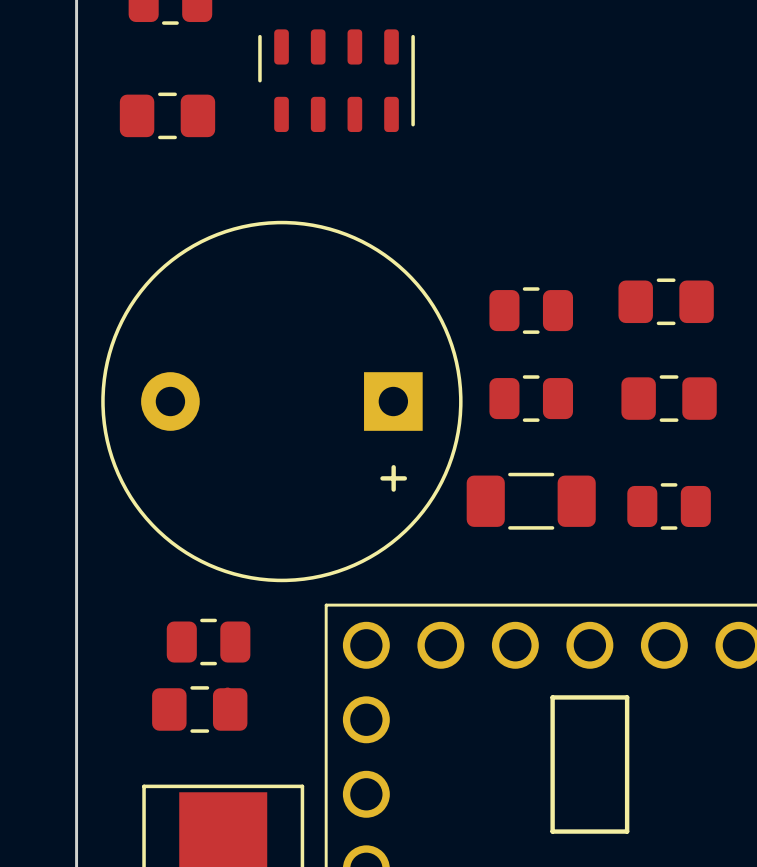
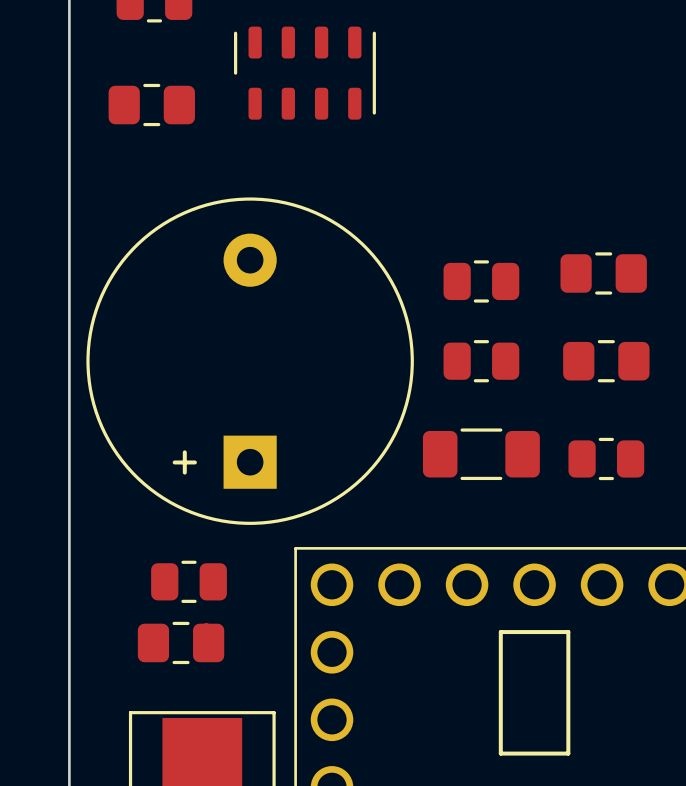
part rotation: 0° (281, 401) -> 90° clockwise (250, 361)

